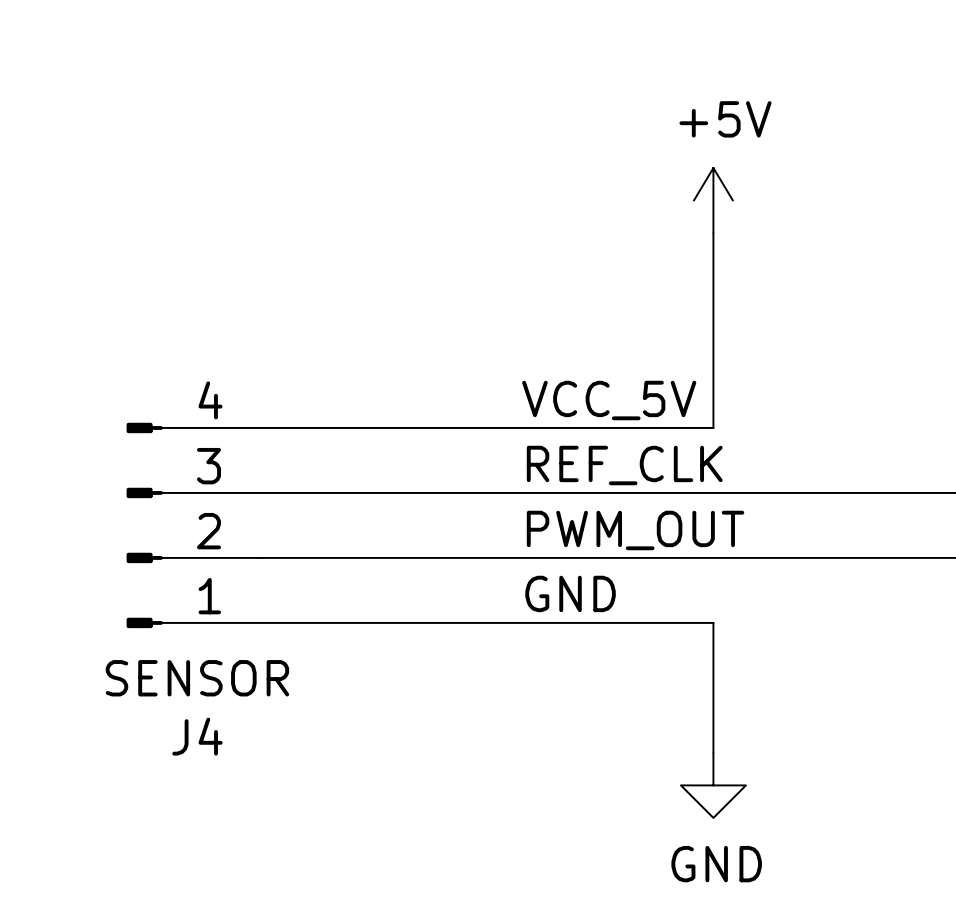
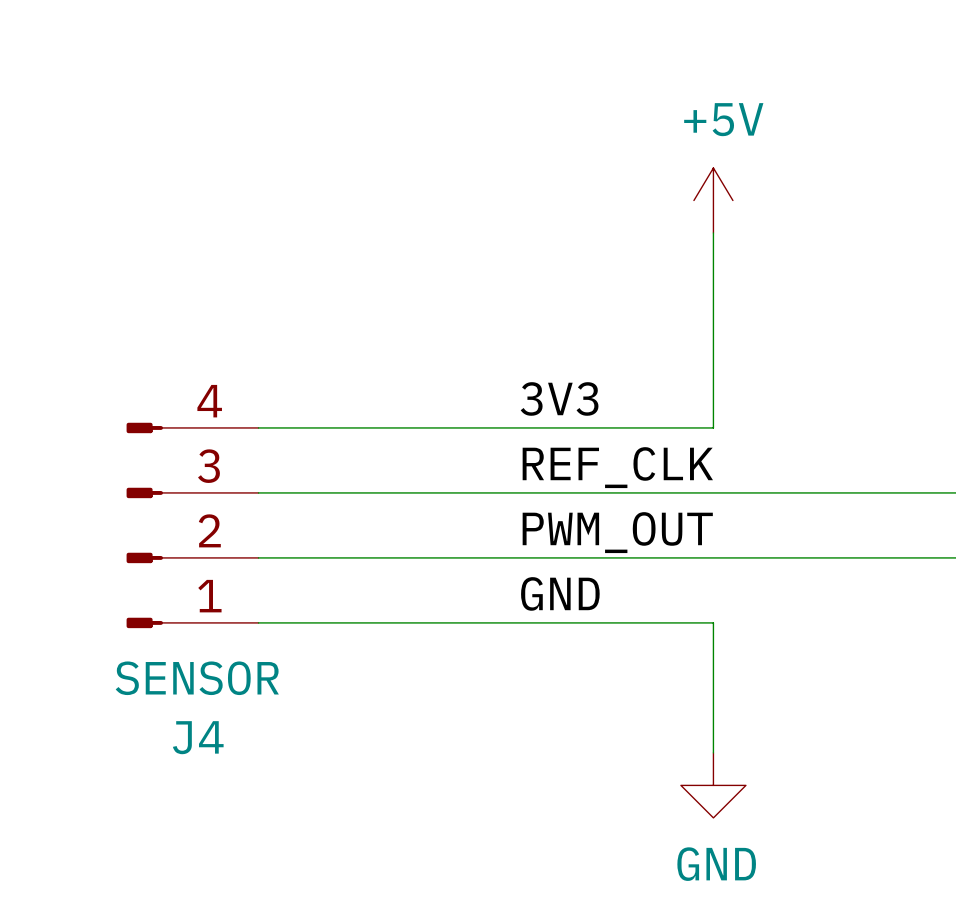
label: VCC_5V (609, 400) -> 3V3 (559, 398)

